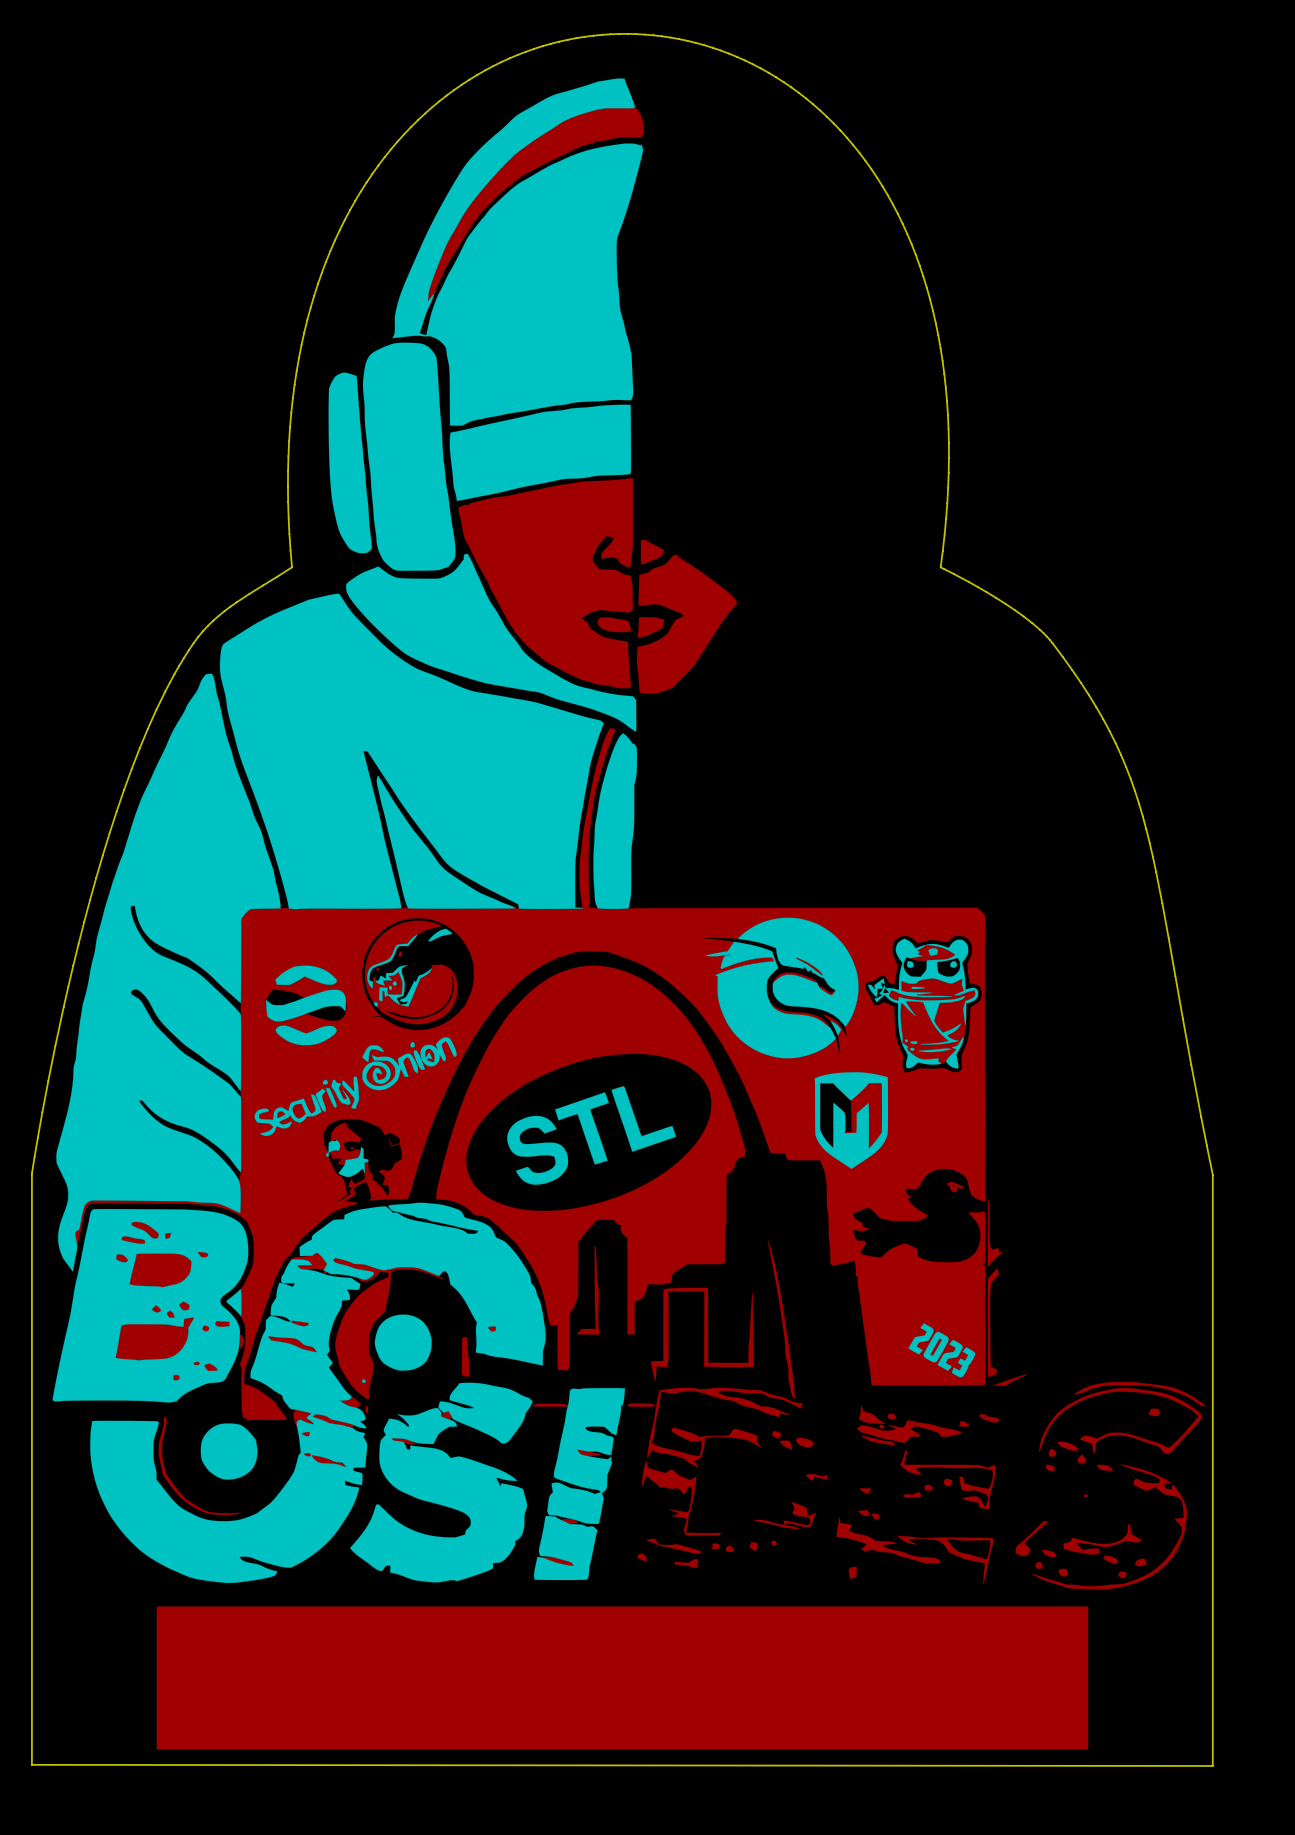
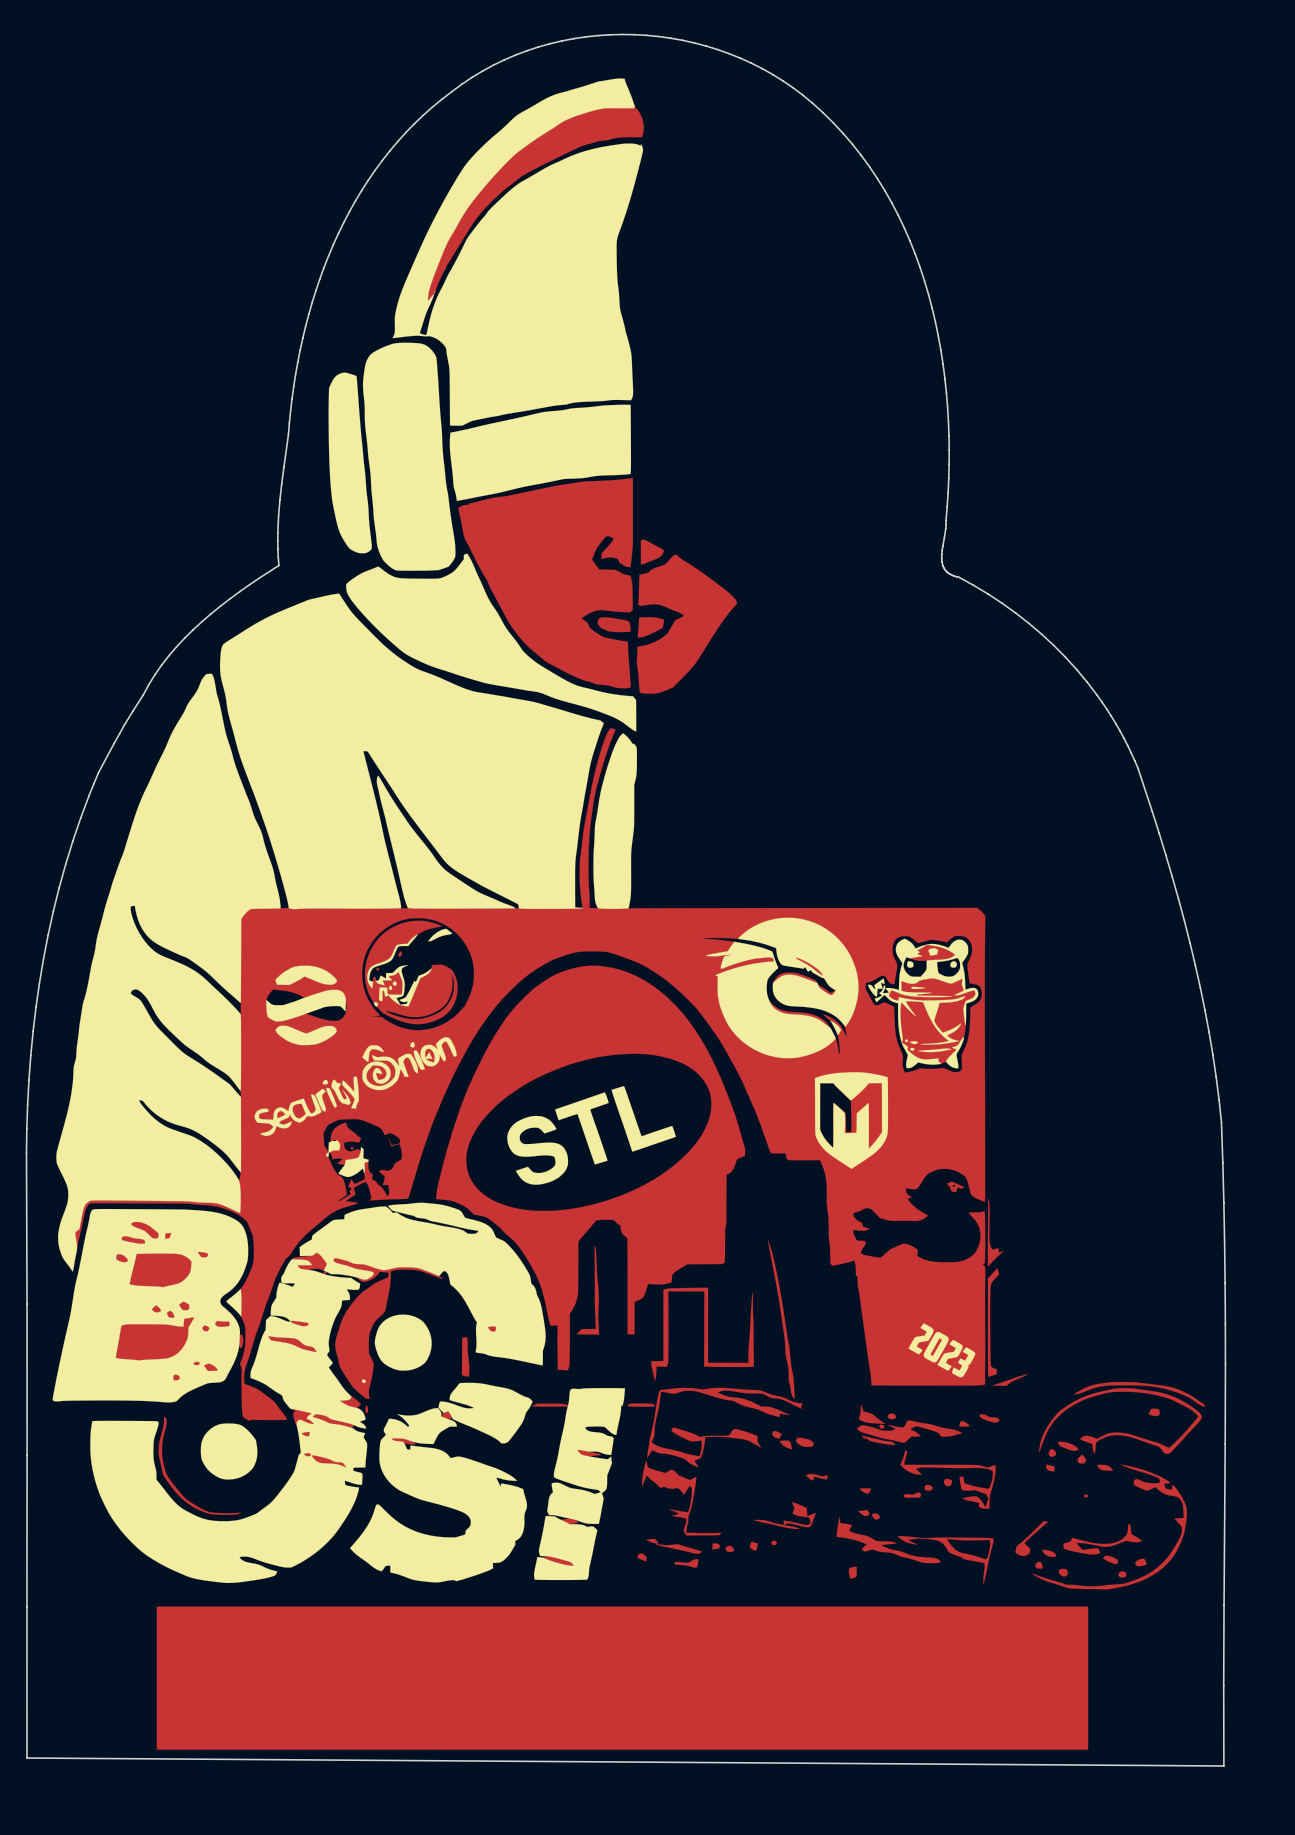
board edge: (619, 33) (661, 36) (695, 42) (728, 53) (760, 68) (791, 87) (820, 110) (846, 137) (871, 169) (897, 214) (915, 254) (930, 299) (940, 348) (947, 401) (948, 457) (946, 518) (940, 567) (1005, 603) (1032, 623) (1049, 639) (1080, 682) (1103, 719) (1120, 754) (1134, 790) (1156, 872) (1212, 1174) (1212, 1765) (31, 1764) (31, 1173) (48, 1081) (68, 986) (90, 900) (116, 811) (139, 748) (156, 709) (174, 674) (193, 643) (207, 625) (224, 611) (292, 567) (288, 518) (288, 456) (291, 412) (298, 358) (310, 307) (326, 261) (344, 220) (366, 182) (391, 149) (417, 120) (446, 95) (477, 74) (509, 58) (542, 46) (576, 38) (619, 33) -> (622, 34) (585, 36) (549, 43) (515, 55) (482, 71) (452, 91) (423, 115) (397, 141) (375, 170) (355, 201) (333, 244) (319, 278) (305, 326) (293, 386) (281, 483) (277, 532) (278, 565) (211, 613) (168, 655) (154, 674) (114, 743) (98, 772) (80, 818) (65, 864) (48, 935) (36, 1007) (28, 1079) (26, 1152) (27, 1758) (1223, 1765) (1225, 1323) (1221, 1122) (1212, 1054) (1195, 965) (1172, 876) (1138, 768) (1123, 738) (1106, 709) (1065, 657) (1015, 612) (973, 585) (949, 574) (943, 567) (941, 554) (948, 492) (948, 435) (944, 378) (938, 336) (924, 280) (910, 241) (891, 202) (869, 166) (843, 133) (823, 112) (793, 87) (762, 68) (729, 53) (694, 42) (658, 36) (622, 34)

